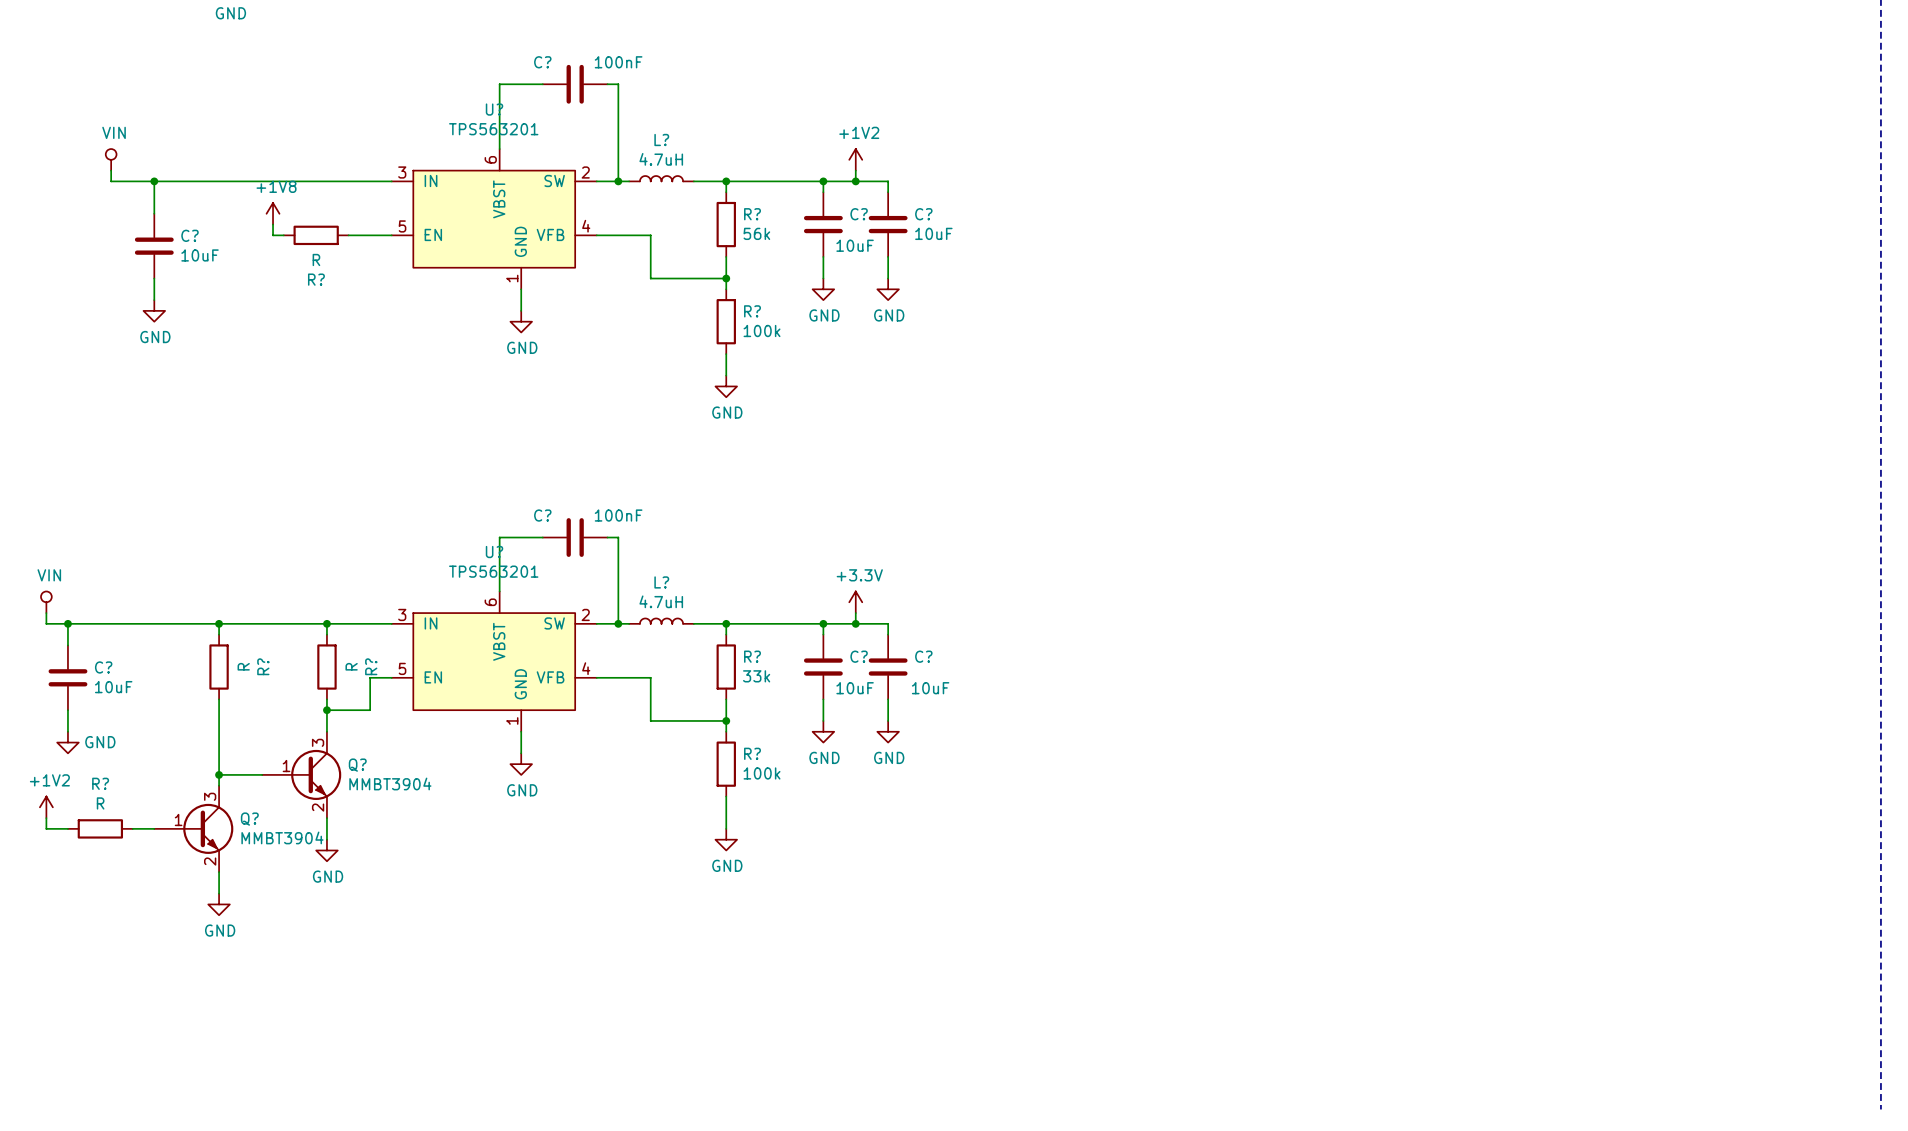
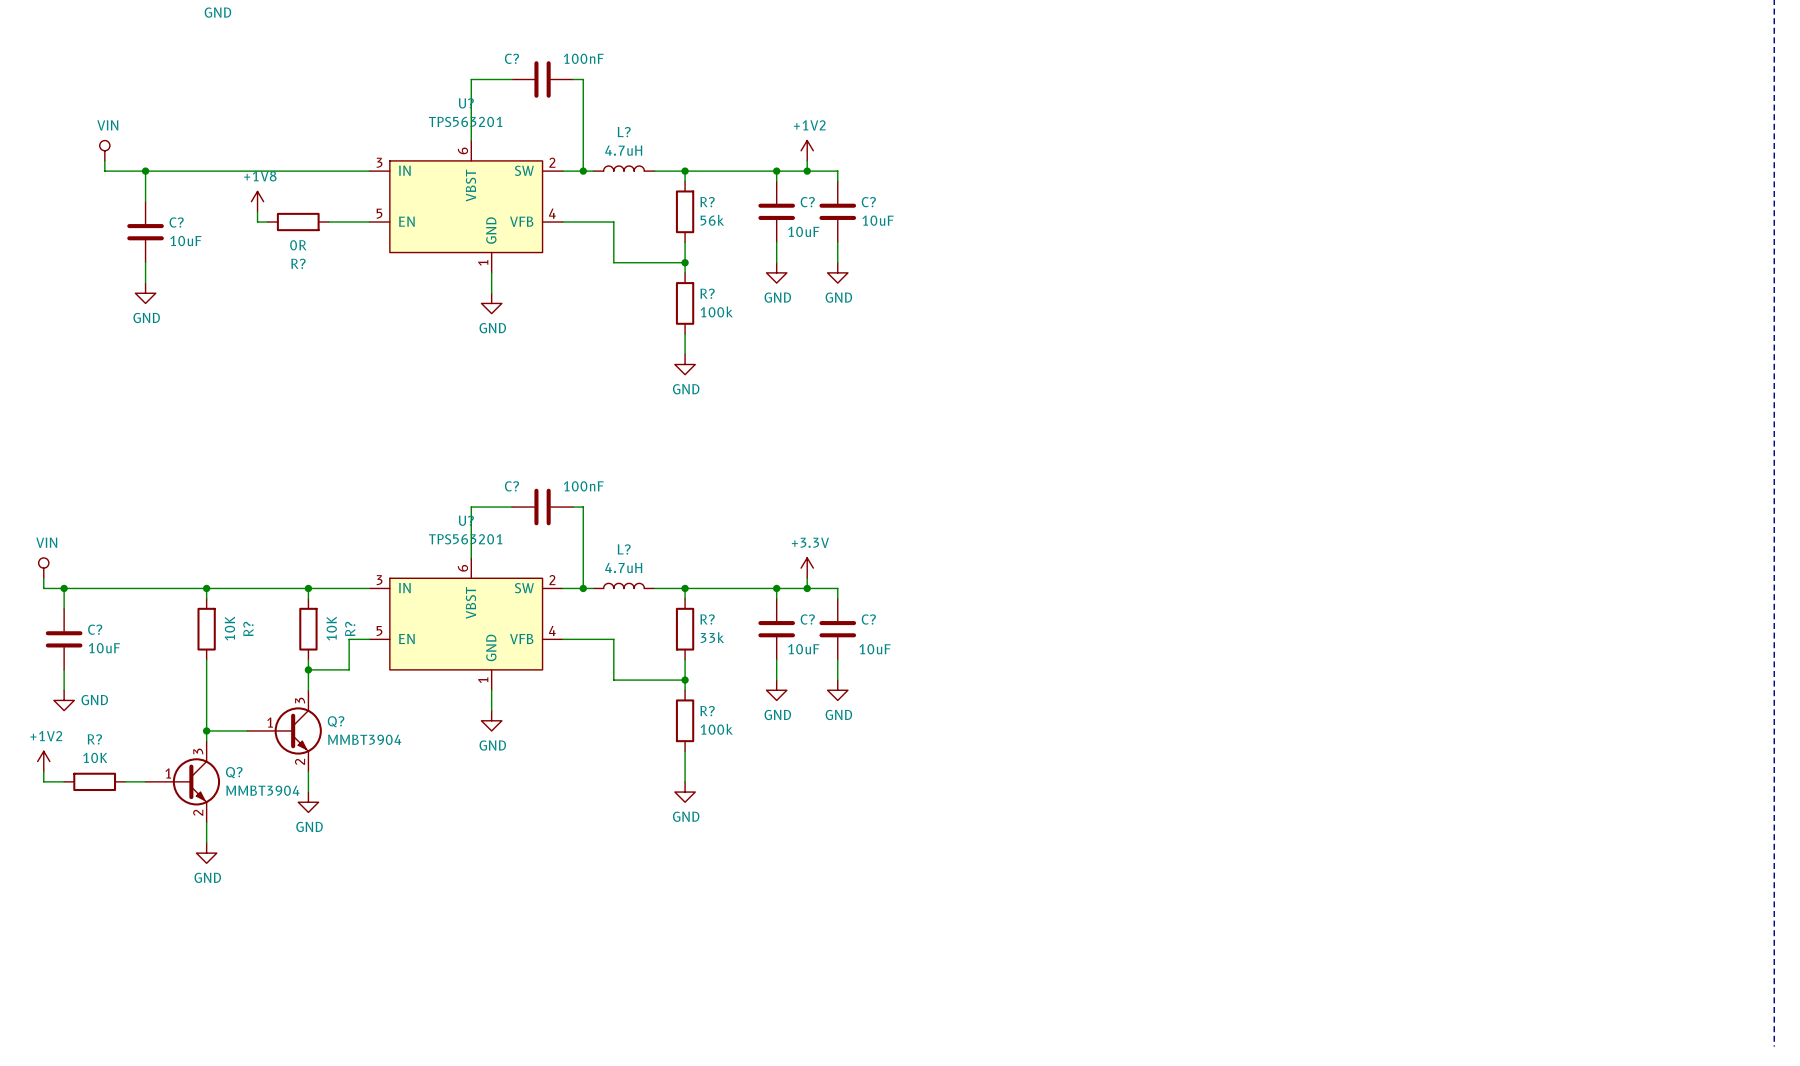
R? value: R (316, 259) -> 0R (298, 245)
R? value: R (243, 666) -> 10K (229, 628)
R? value: R (351, 666) -> 10K (331, 628)
R? value: R (100, 803) -> 10K (95, 757)

